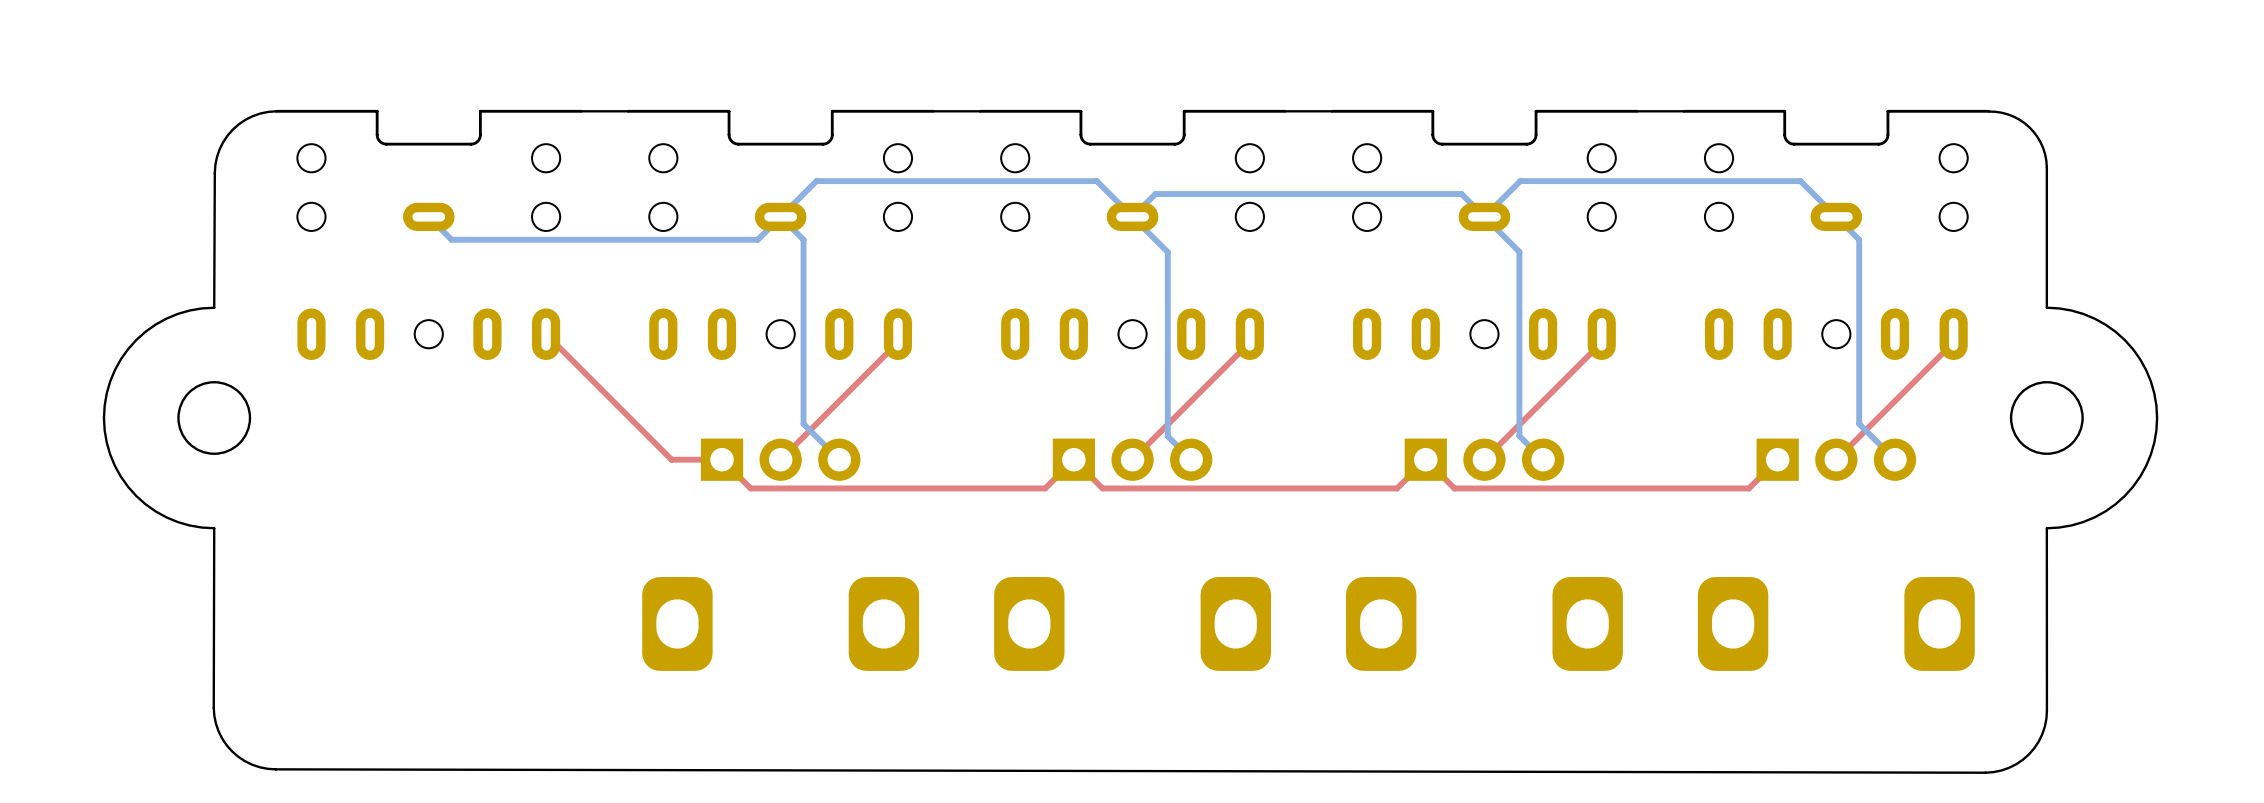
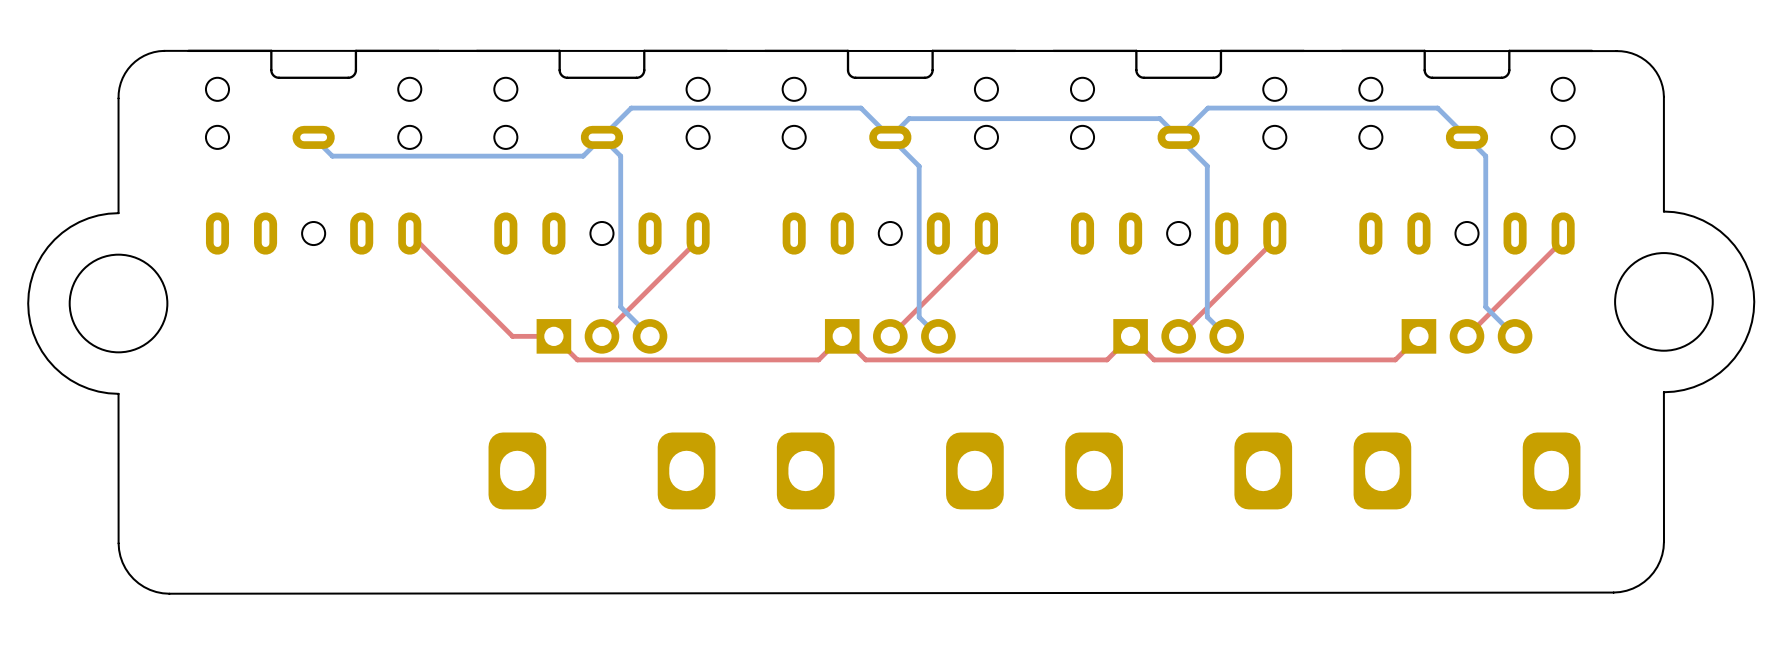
board edge: (276, 111) (252, 116) (238, 124) (223, 142) (216, 157) (214, 173) (214, 307) (189, 310) (166, 318) (136, 340) (120, 359) (110, 381) (103, 417) (110, 454) (120, 476) (136, 495) (166, 517) (189, 525) (214, 528) (214, 715) (218, 731) (226, 745) (238, 756) (252, 764) (275, 769) (1985, 772) (2009, 767) (2022, 759) (2034, 748) (2044, 726) (2046, 710) (2046, 528) (2071, 525) (2094, 517) (2124, 495) (2140, 476) (2150, 454) (2157, 417) (2150, 381) (2140, 359) (2124, 340) (2094, 318) (2071, 310) (2046, 307) (2045, 154) (2037, 137) (2024, 123) (2007, 114) (1988, 111) -> (188, 50) (1626, 52) (1641, 57) (1649, 64) (1658, 76) (1662, 86) (1663, 211) (1684, 213) (1703, 220) (1720, 231) (1734, 245) (1745, 262) (1752, 281) (1754, 301) (1752, 321) (1740, 349) (1720, 372) (1693, 387) (1663, 392) (1663, 541) (1662, 554) (1657, 567) (1649, 577) (1638, 585) (1620, 592) (162, 593) (150, 589) (138, 583) (125, 568) (120, 556) (118, 543) (118, 393) (88, 388) (70, 380) (54, 367) (37, 342) (30, 323) (28, 303) (33, 273) (42, 255) (54, 239) (79, 222) (98, 215) (118, 213) (118, 93) (125, 73) (135, 61) (148, 53) (159, 51) (188, 50)
round board edge: none -> [1614, 252, 1714, 352]
round board edge: none -> [68, 253, 169, 354]
round board edge: [177, 381, 252, 455] -> none
round board edge: [2009, 381, 2084, 455] -> none

